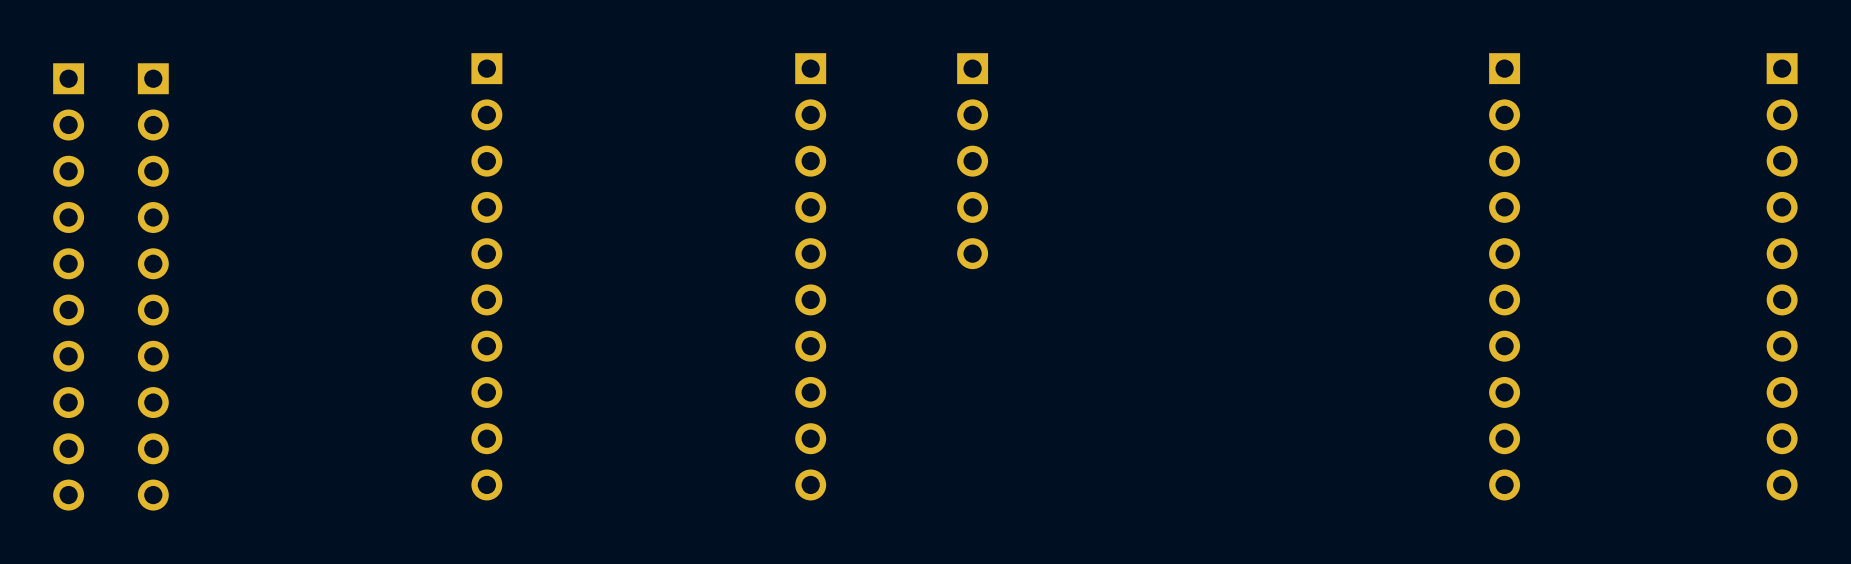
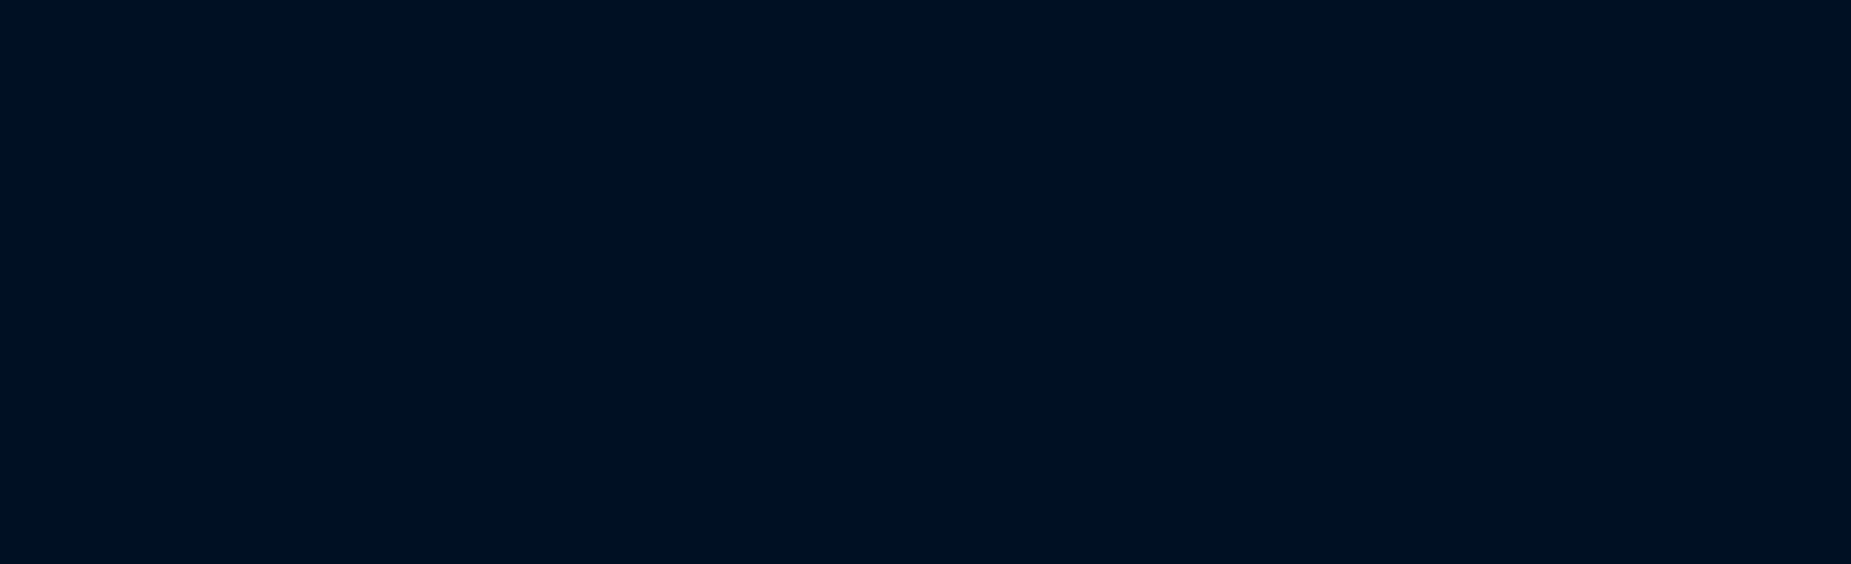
part: (972, 161) -> none
part: (486, 276) -> none
part: (810, 276) -> none
part: (1504, 276) -> none
part: (1782, 276) -> none
part: (68, 286) -> none
part: (153, 286) -> none

